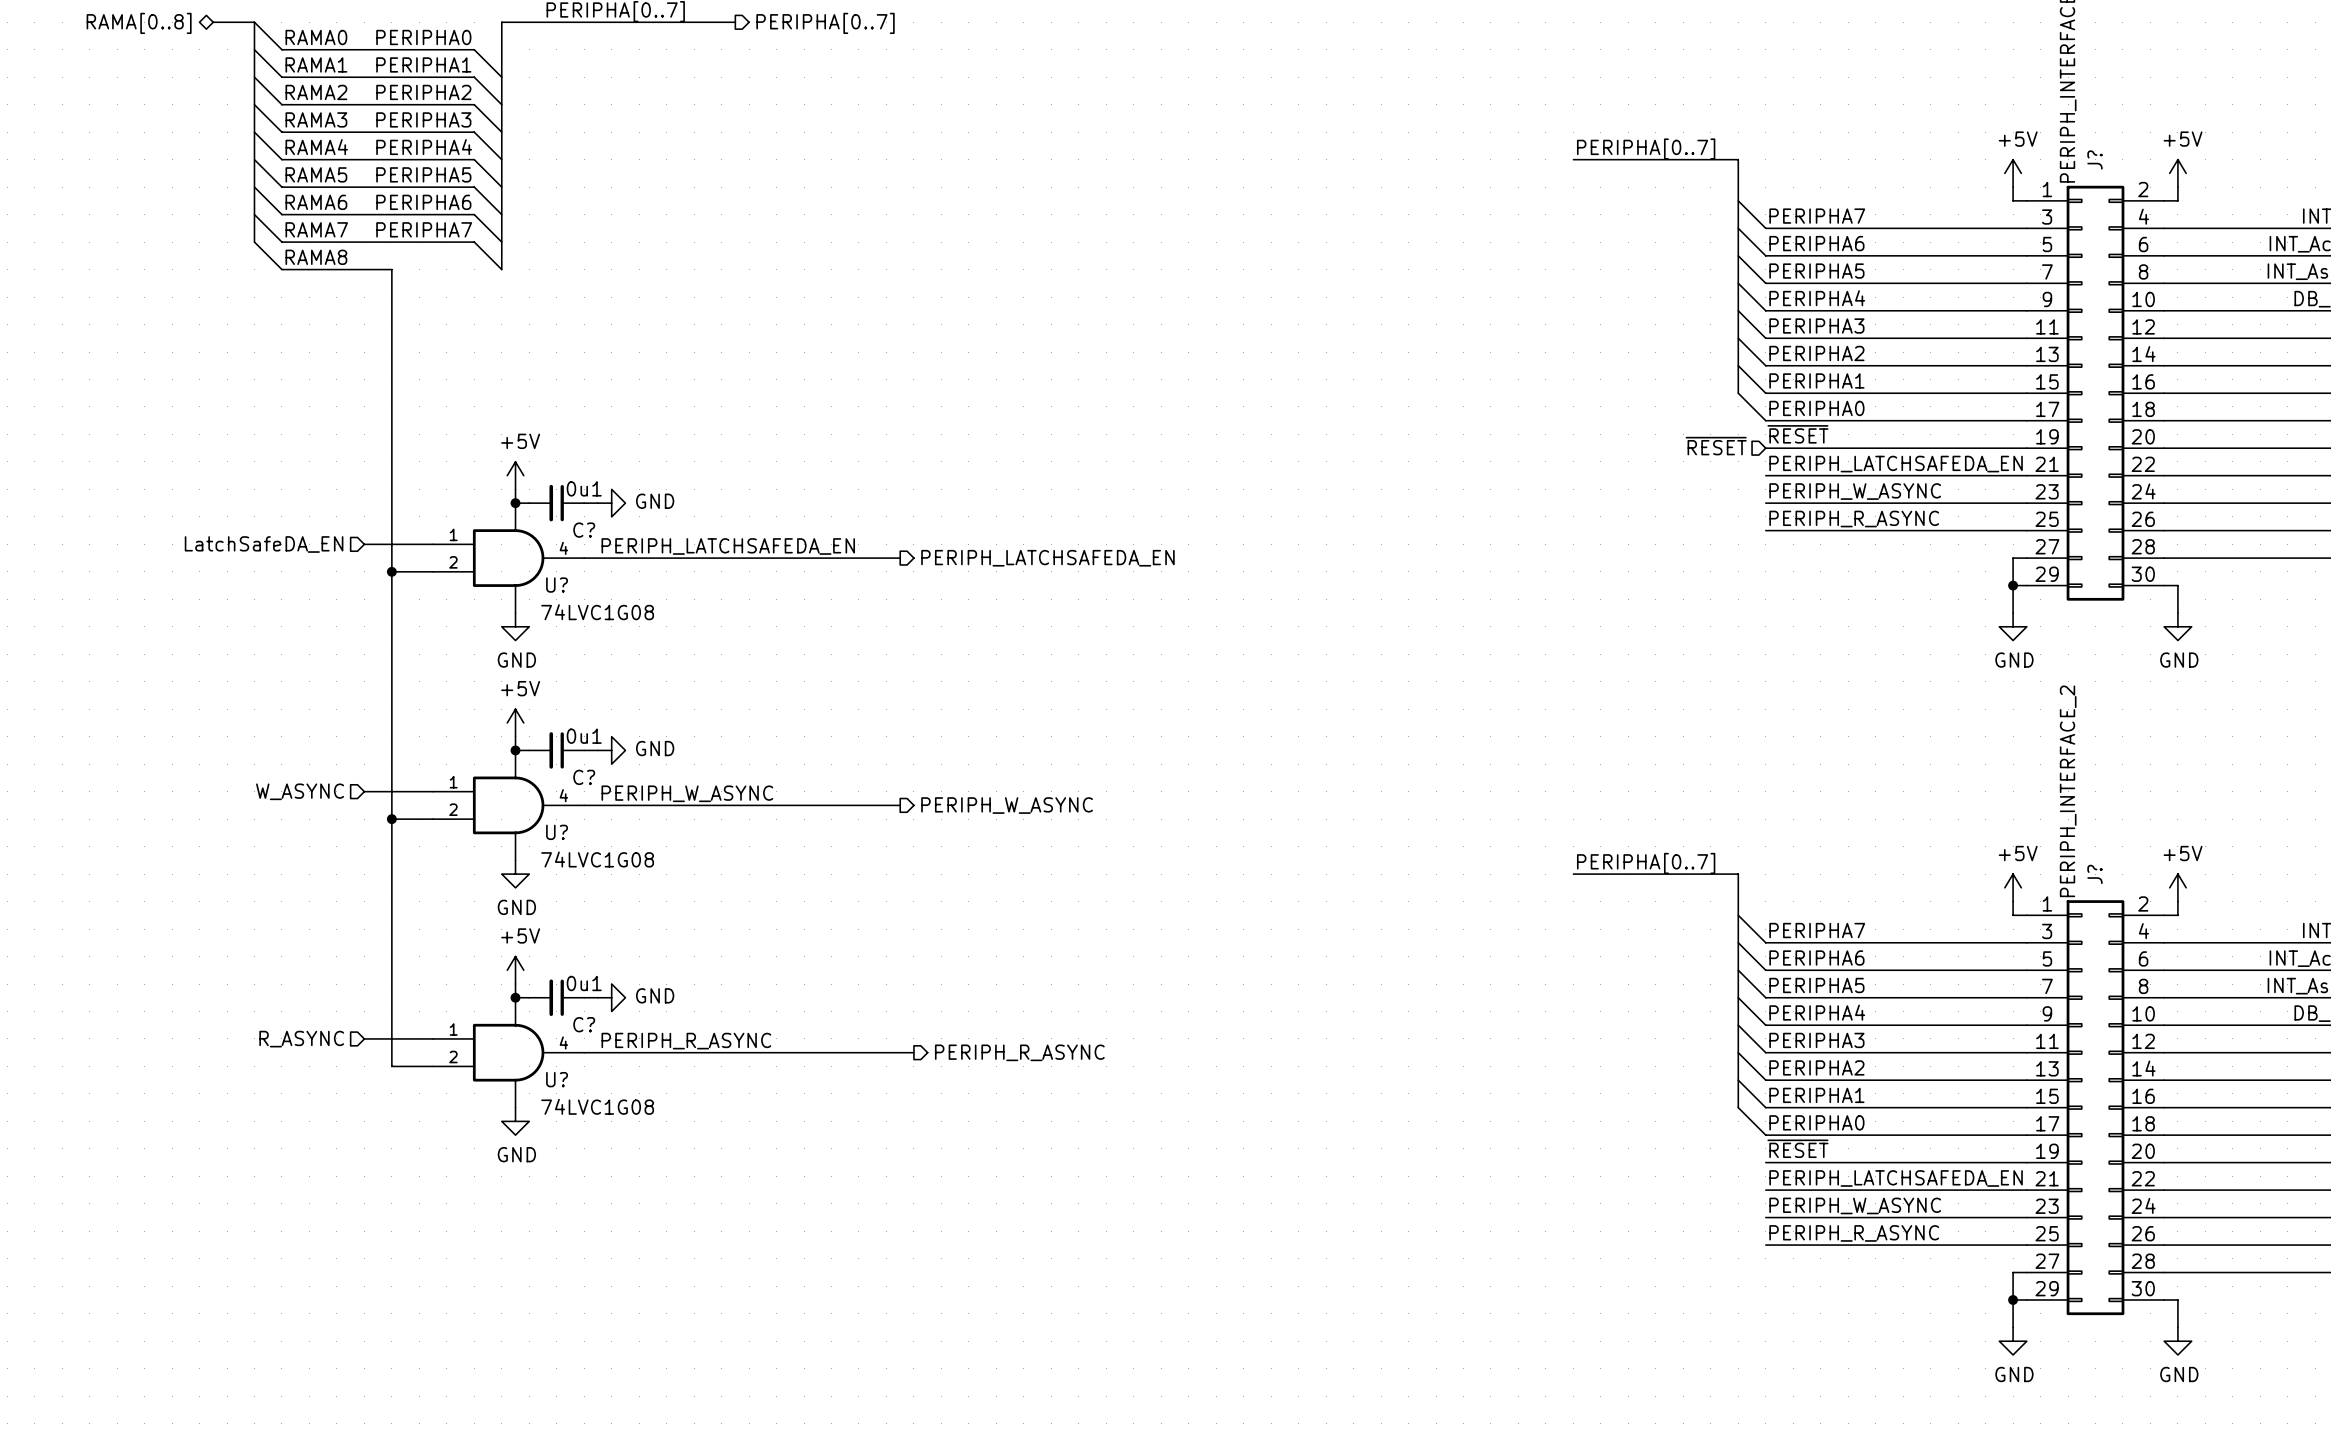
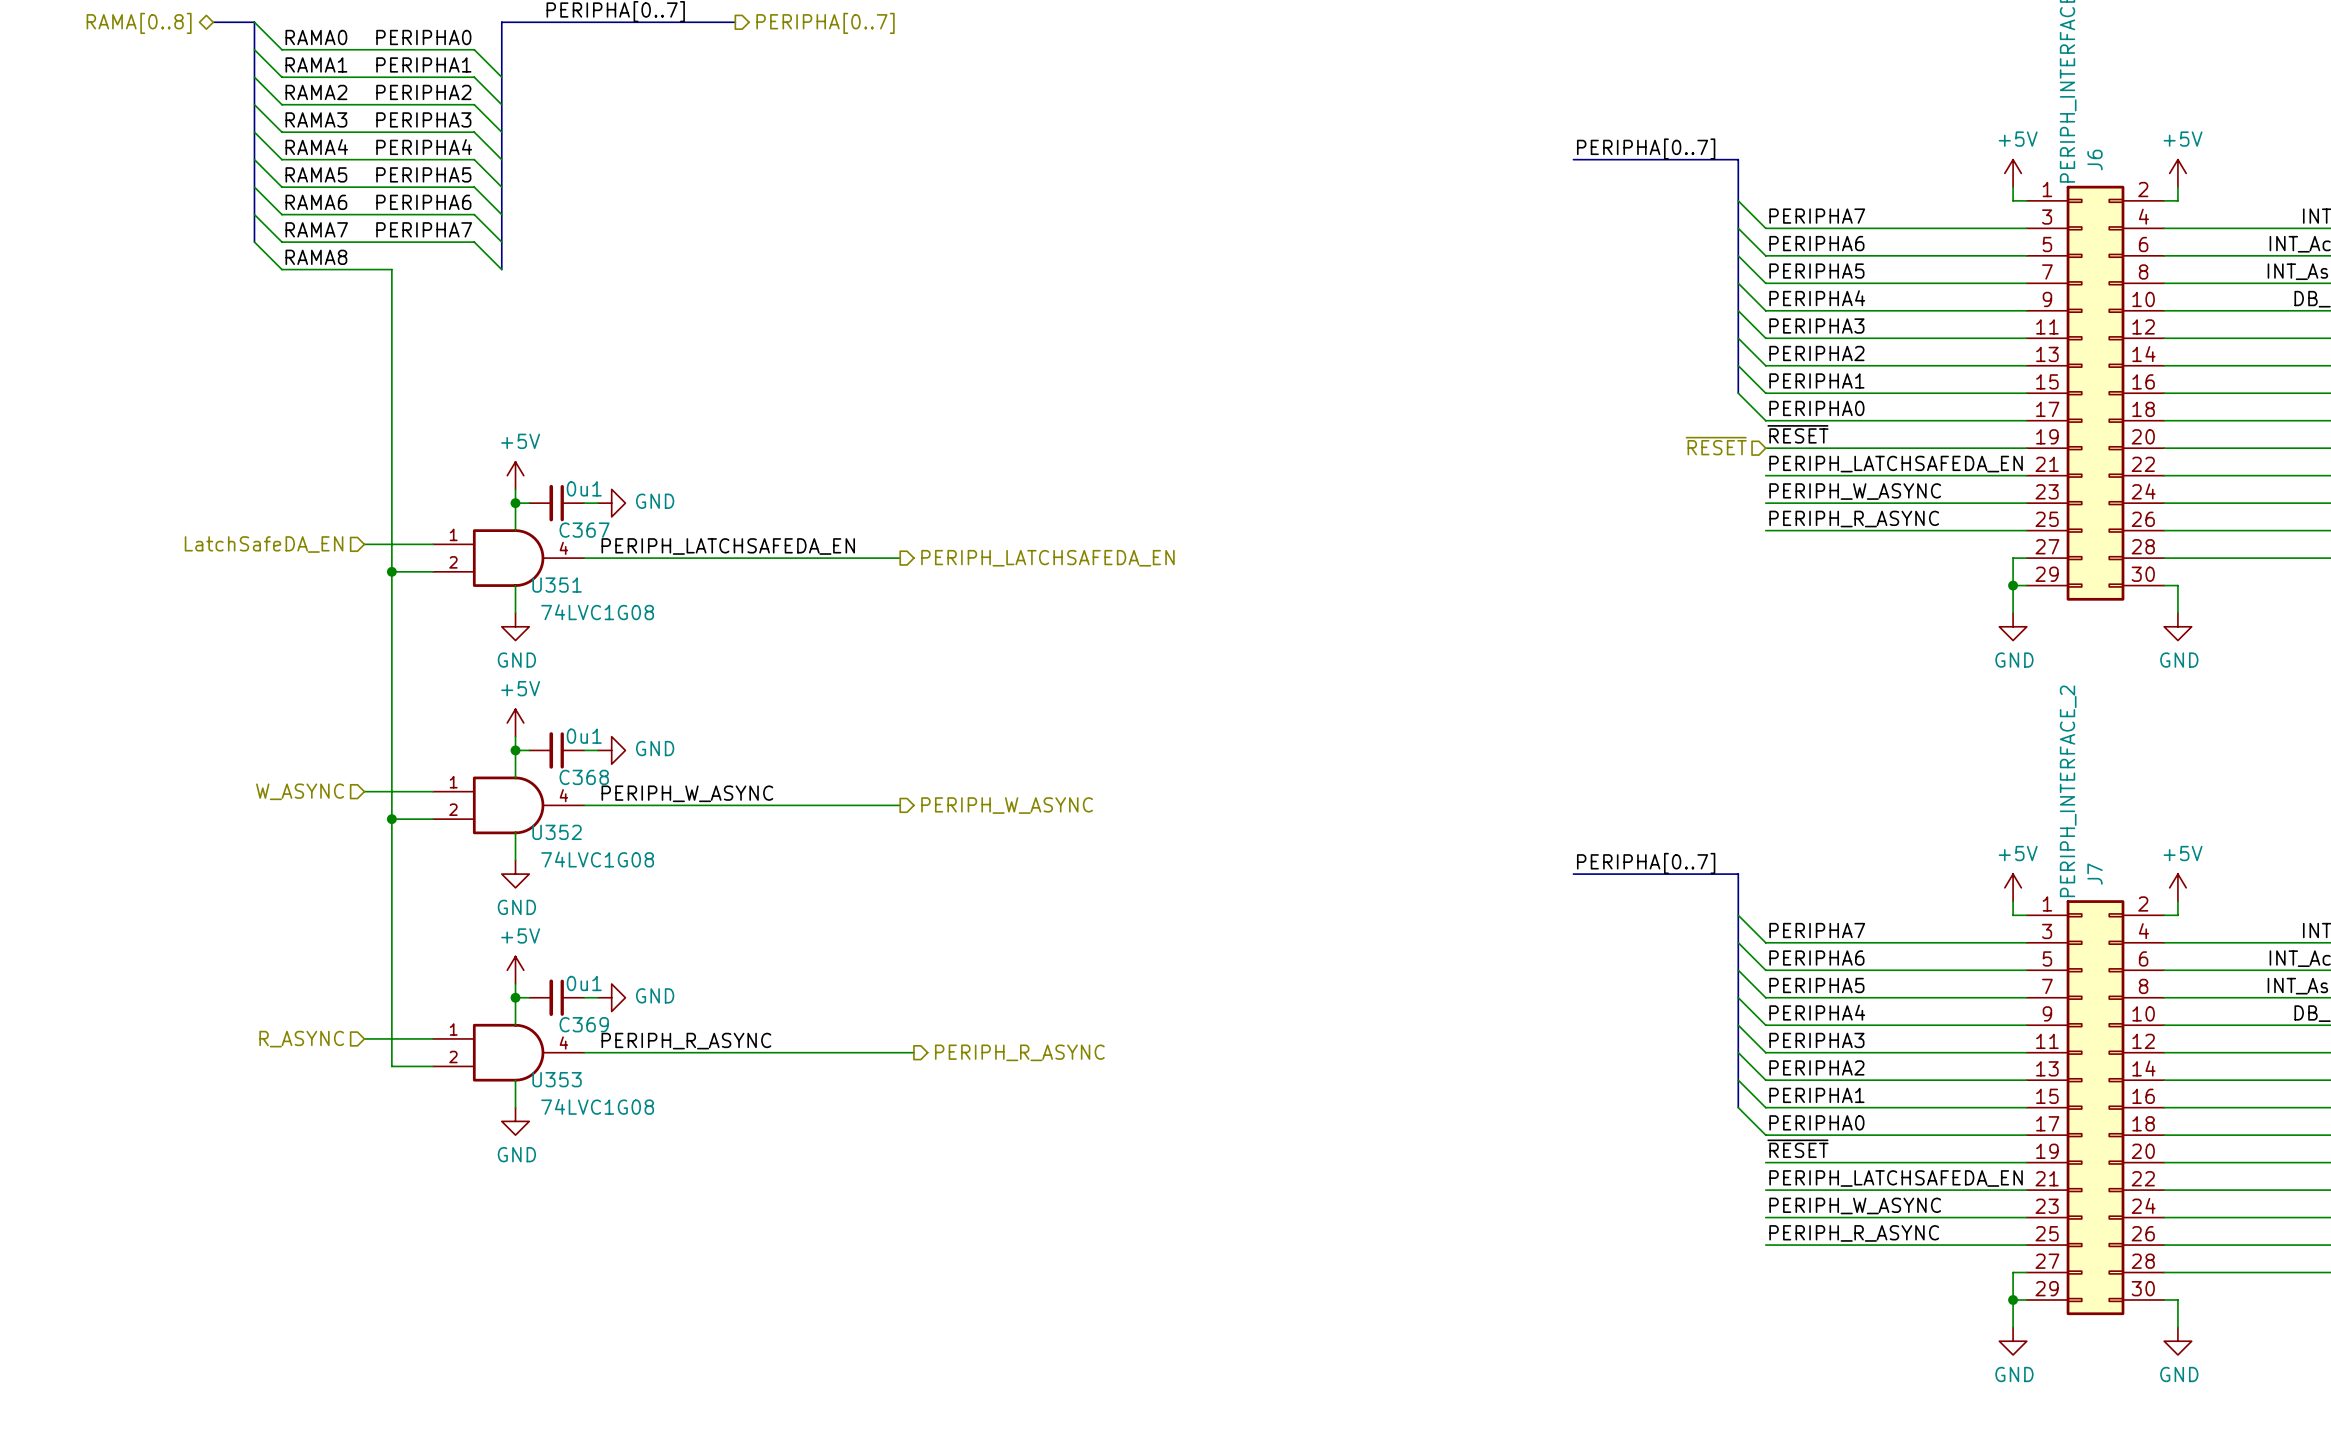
J? name: J? (2094, 159) -> J6 (2094, 159)
C? name: C? (584, 530) -> C367 (584, 530)
U? name: U? (557, 585) -> U351 (557, 585)
C? name: C? (584, 777) -> C368 (584, 777)
U? name: U? (557, 832) -> U352 (557, 832)
J? name: J? (2094, 874) -> J7 (2094, 874)
C? name: C? (584, 1024) -> C369 (584, 1024)
U? name: U? (557, 1079) -> U353 (557, 1079)

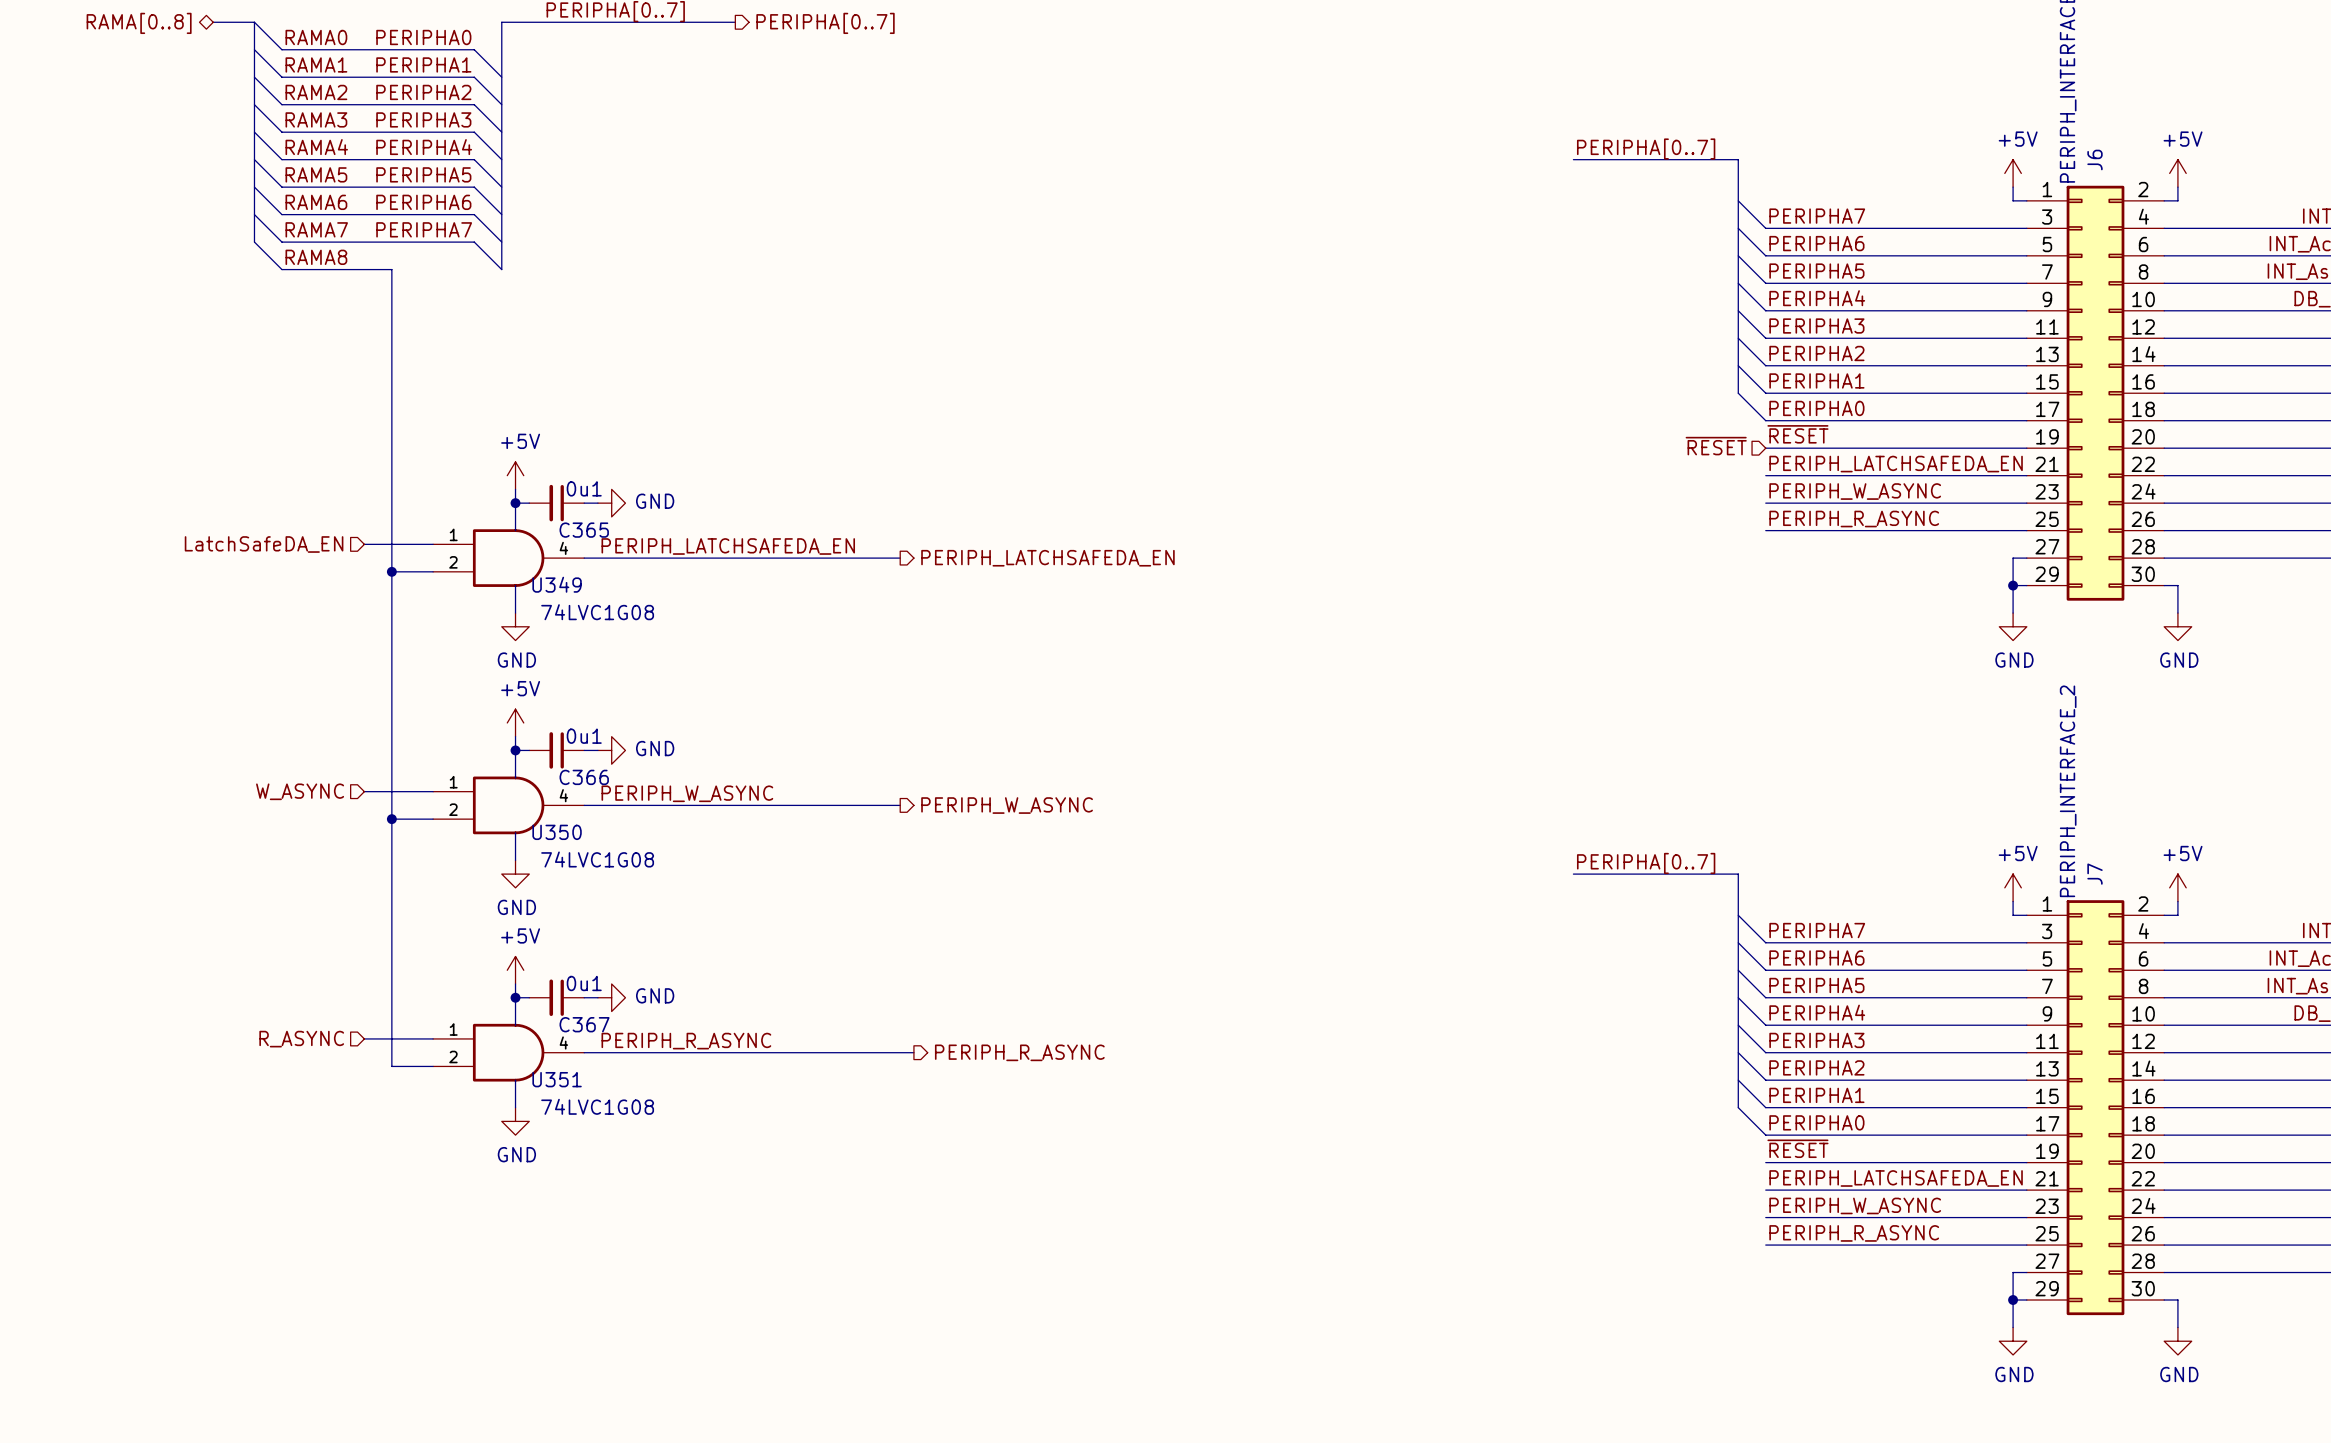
C367 name: C367 (584, 530) -> C365 (584, 530)
U351 name: U351 (557, 585) -> U349 (557, 584)
C368 name: C368 (584, 777) -> C366 (584, 777)
U352 name: U352 (557, 832) -> U350 (557, 832)
C369 name: C369 (584, 1024) -> C367 (584, 1024)
U353 name: U353 (557, 1079) -> U351 (557, 1079)

